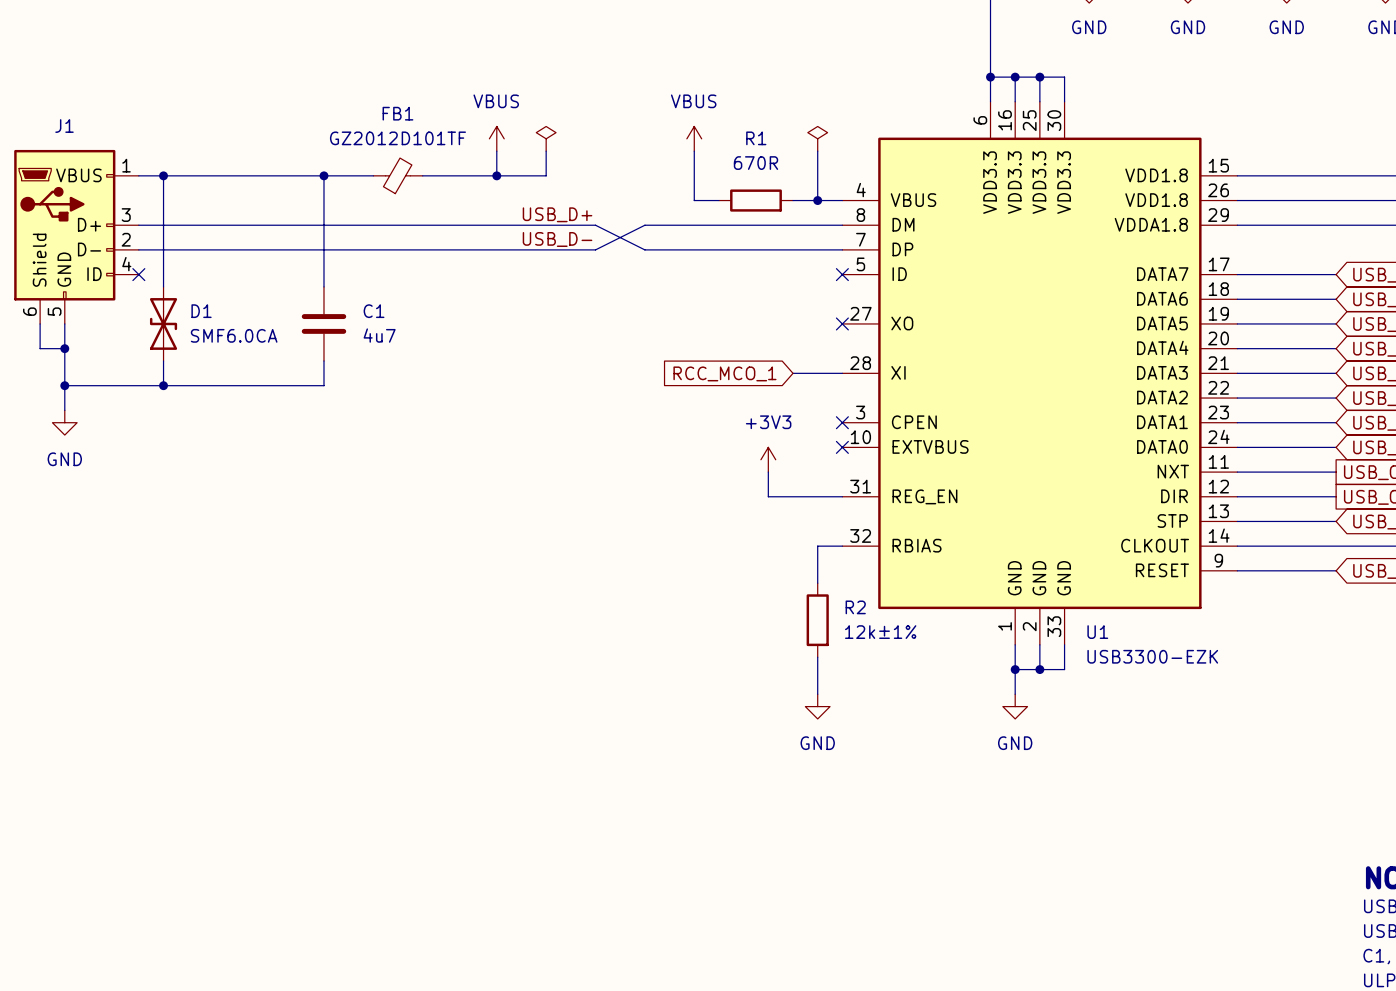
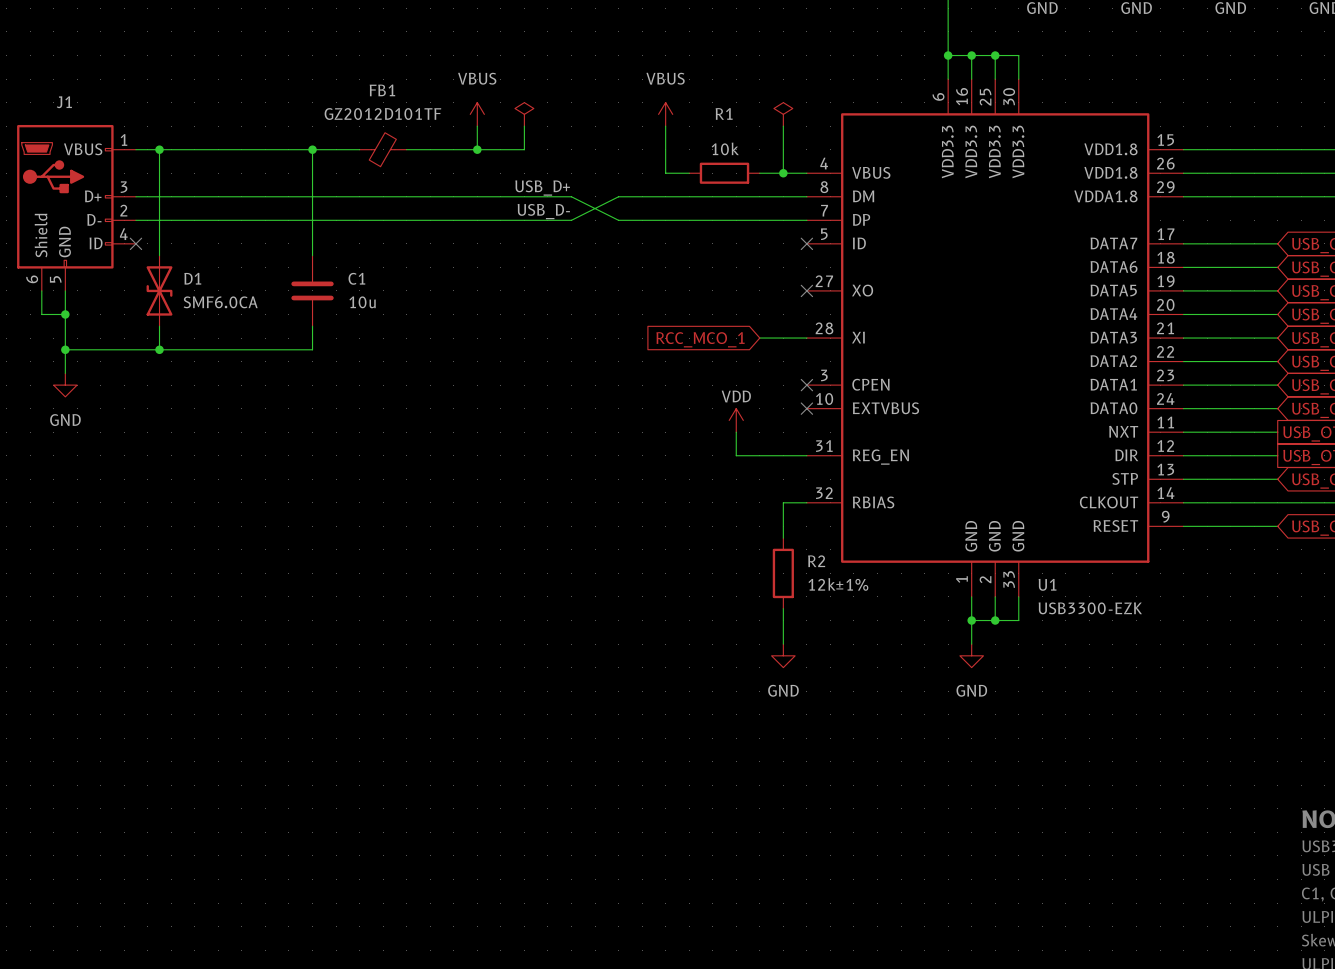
R1 value: 670R (755, 163) -> 10k (725, 148)
C1 value: 4u7 (379, 335) -> 10u (362, 302)
power symbol: +3V3 (768, 459) -> VDD (736, 420)

